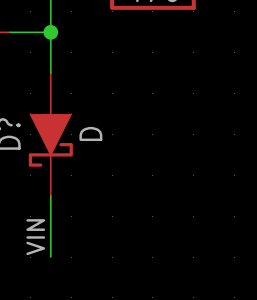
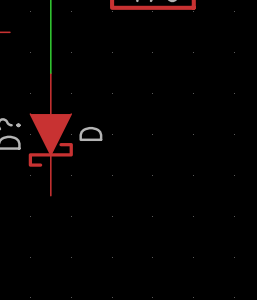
wire: (9, 32) (50, 32) -> none
junction: (50, 32) -> none
wire: (50, 195) (50, 257) -> none
label: VIN (35, 237) -> none

